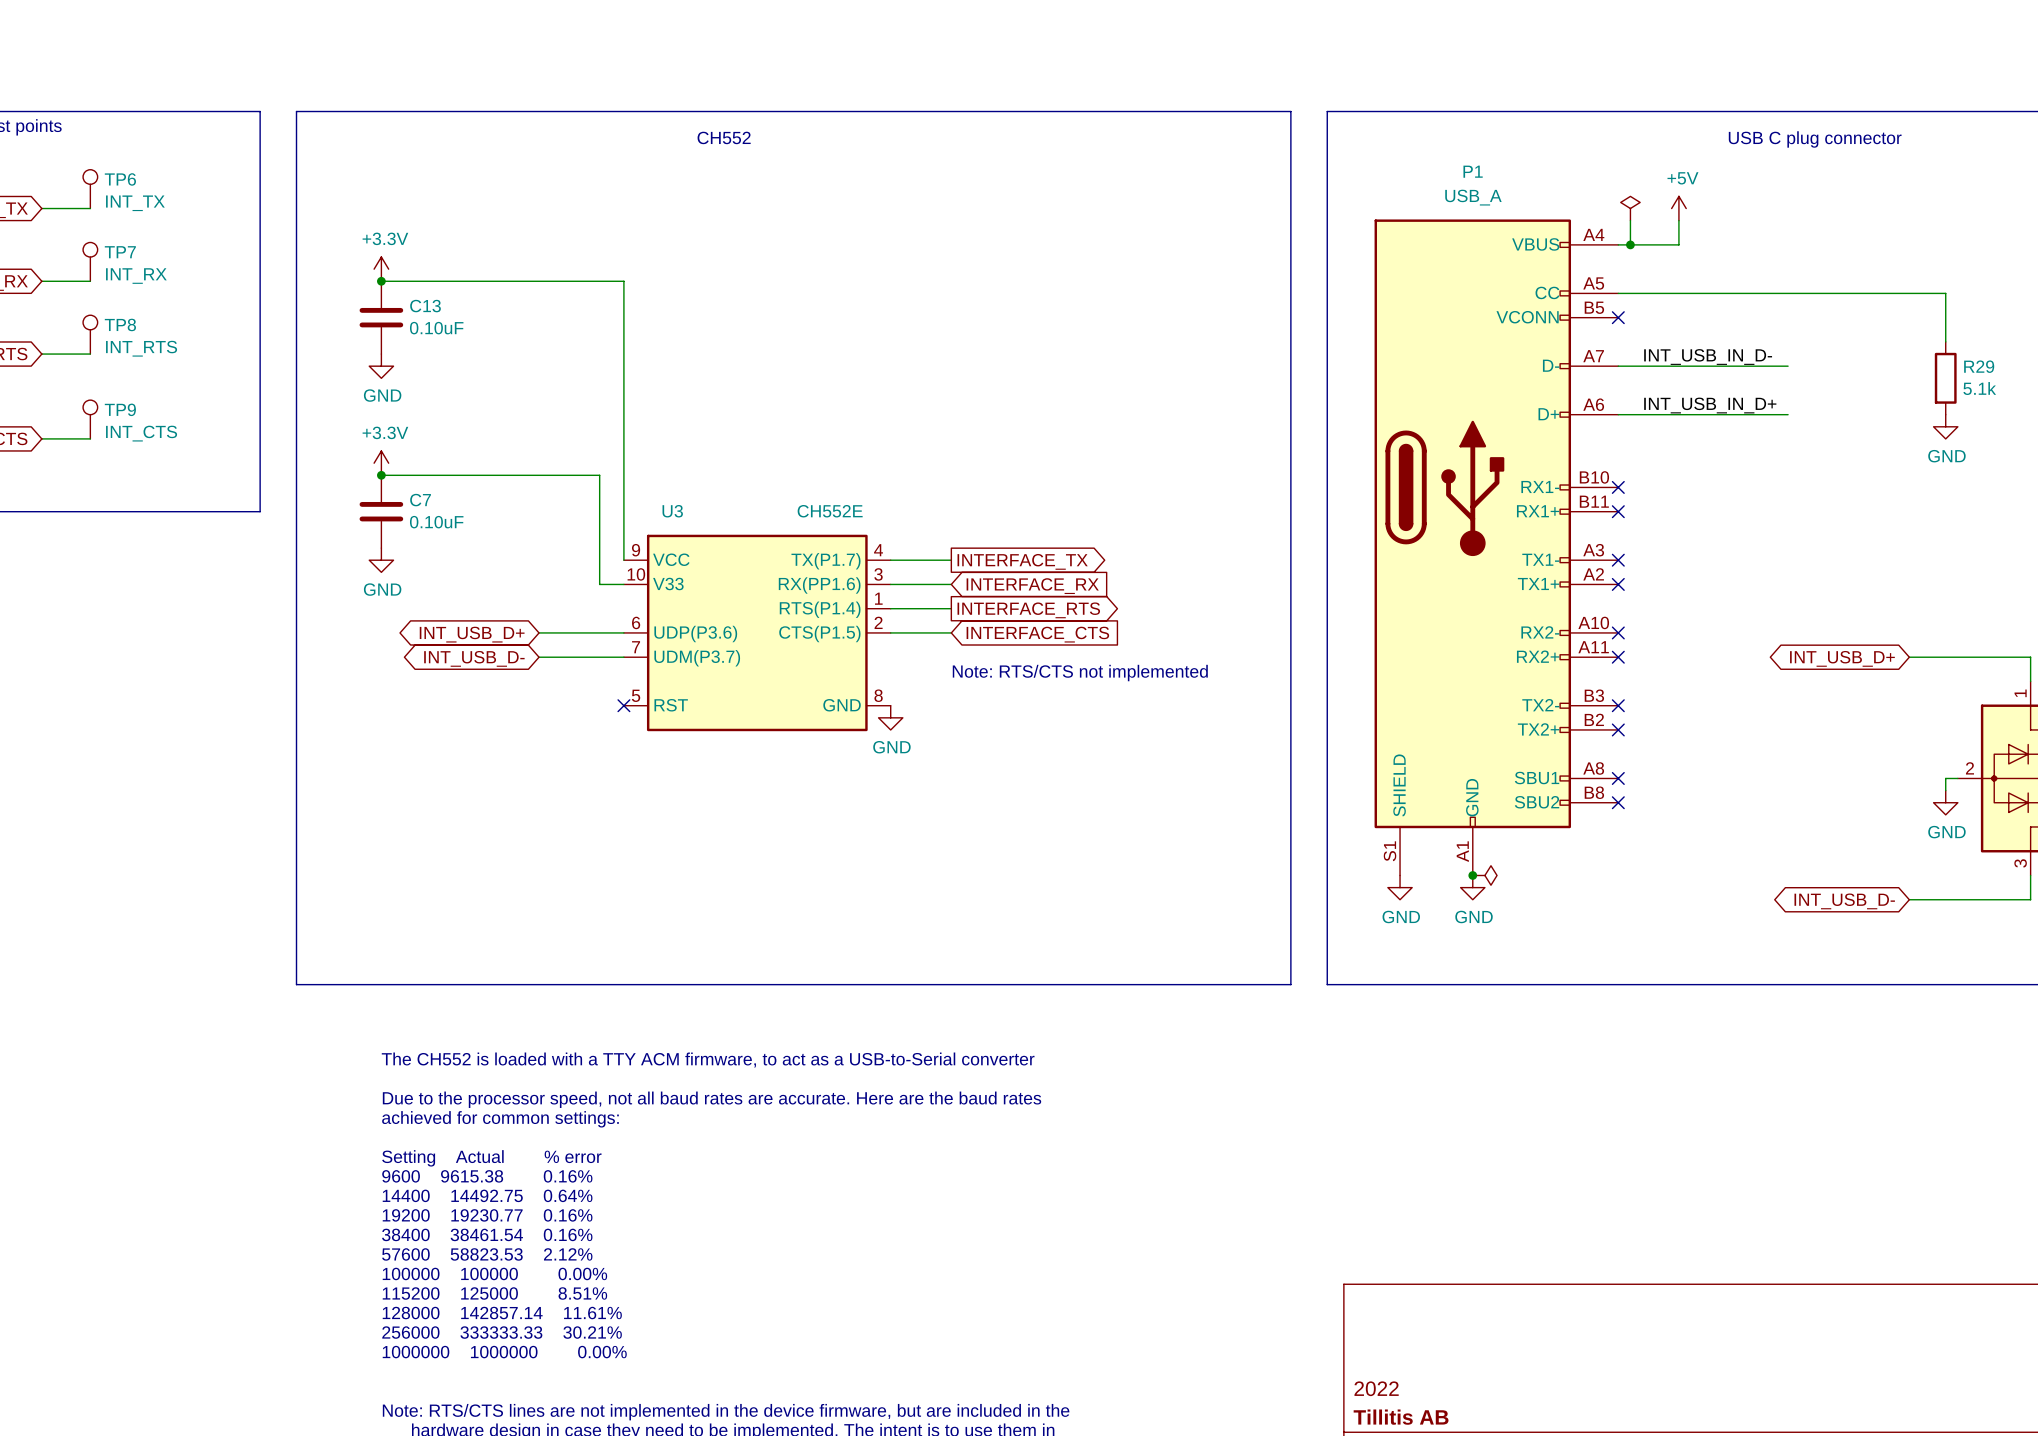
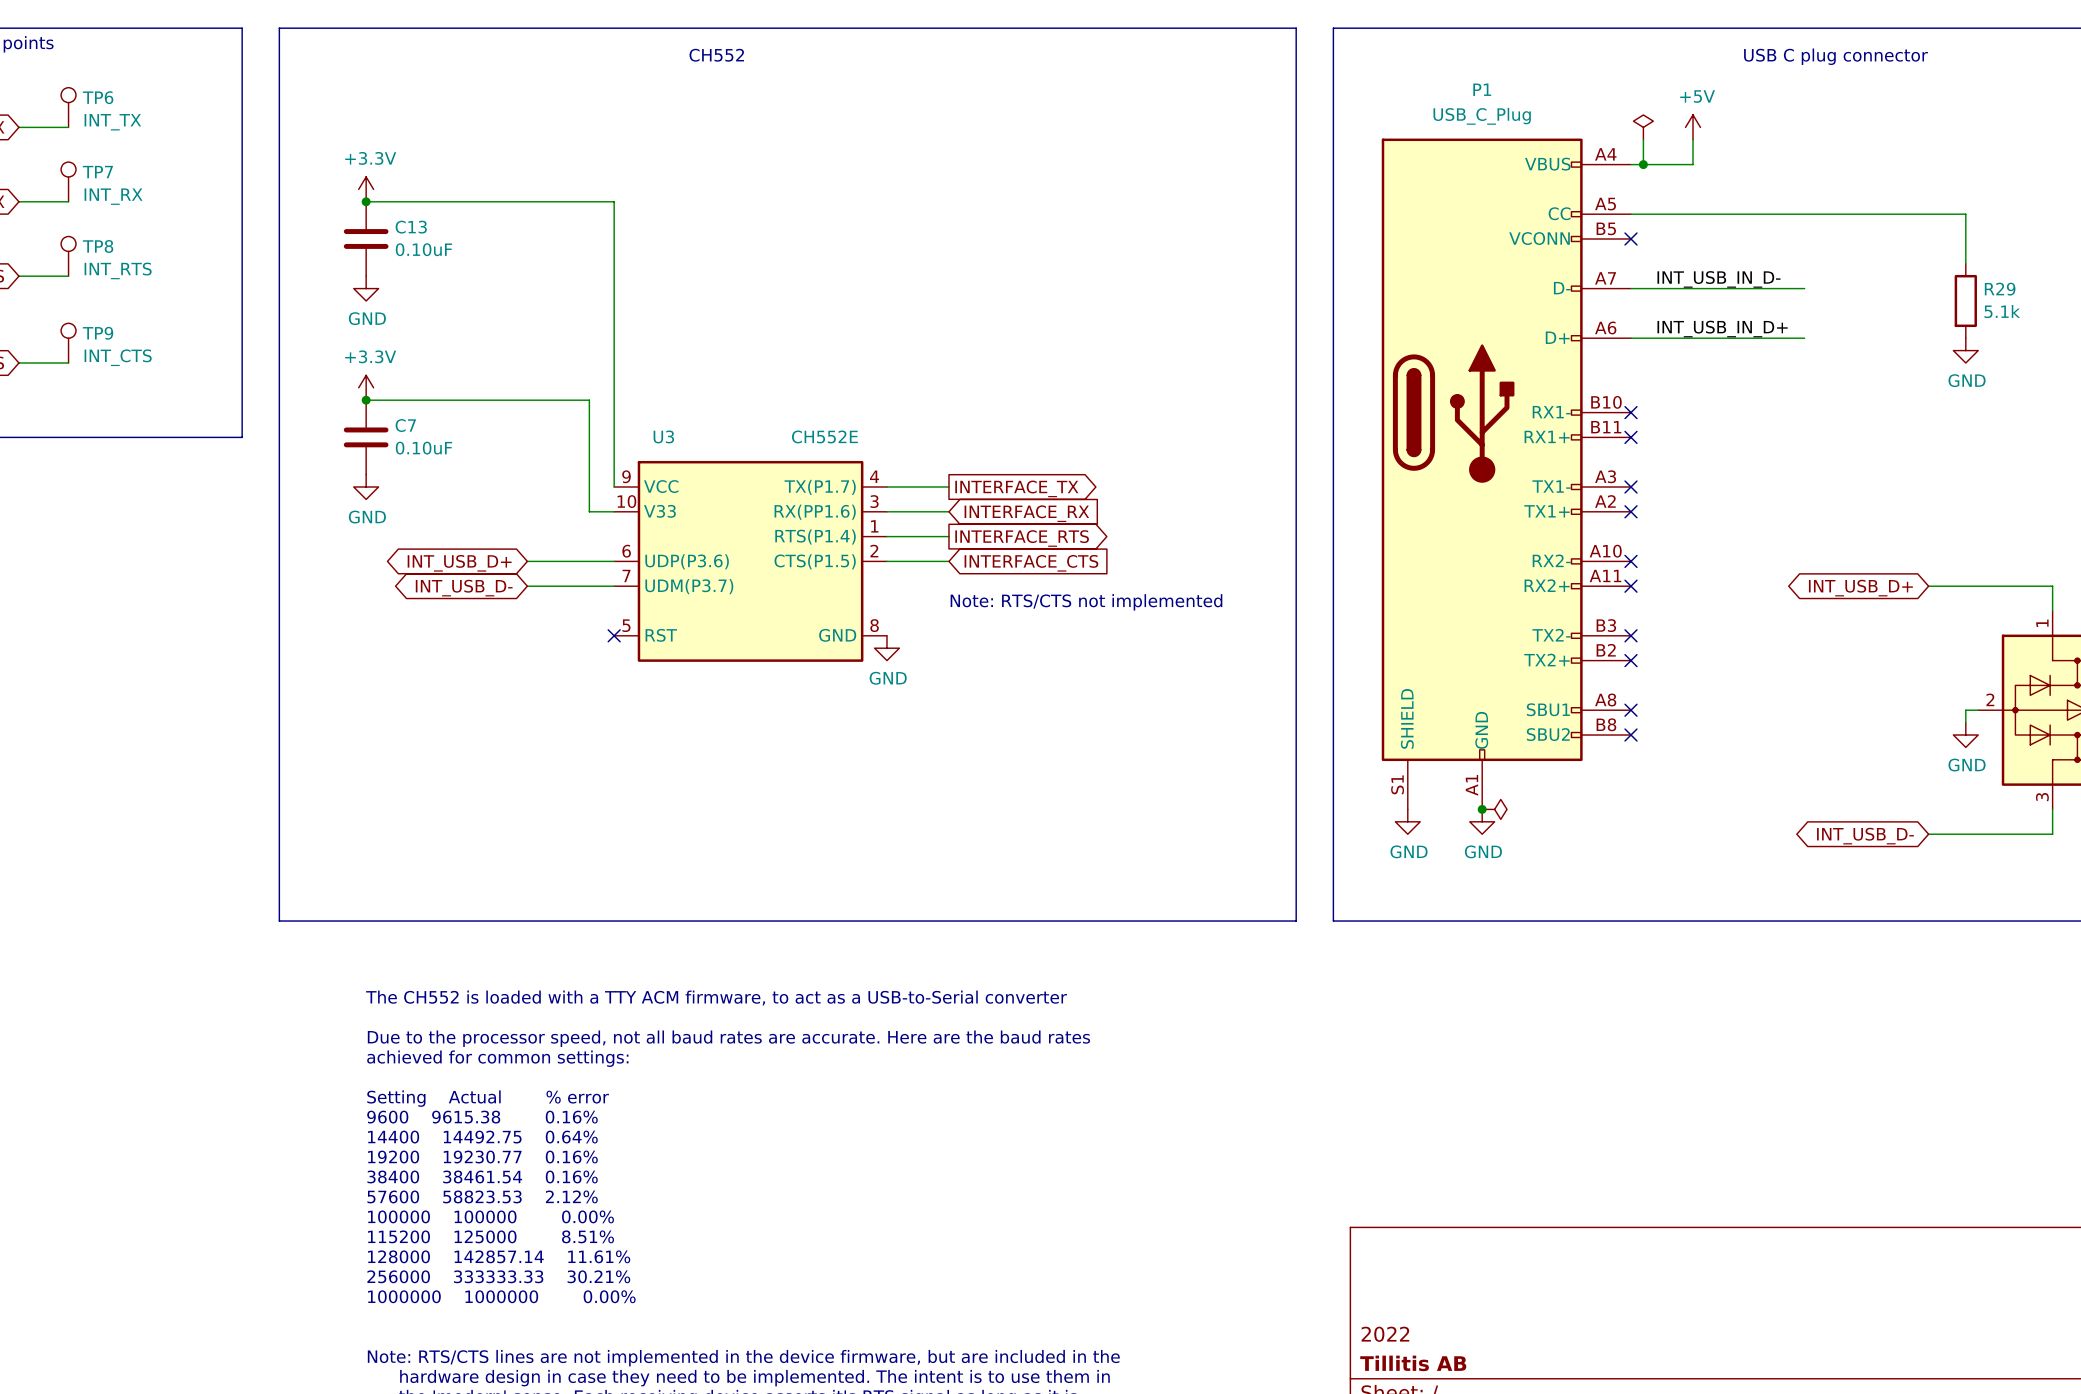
P1 value: USB_A (1473, 197) -> USB_C_Plug (1482, 116)

